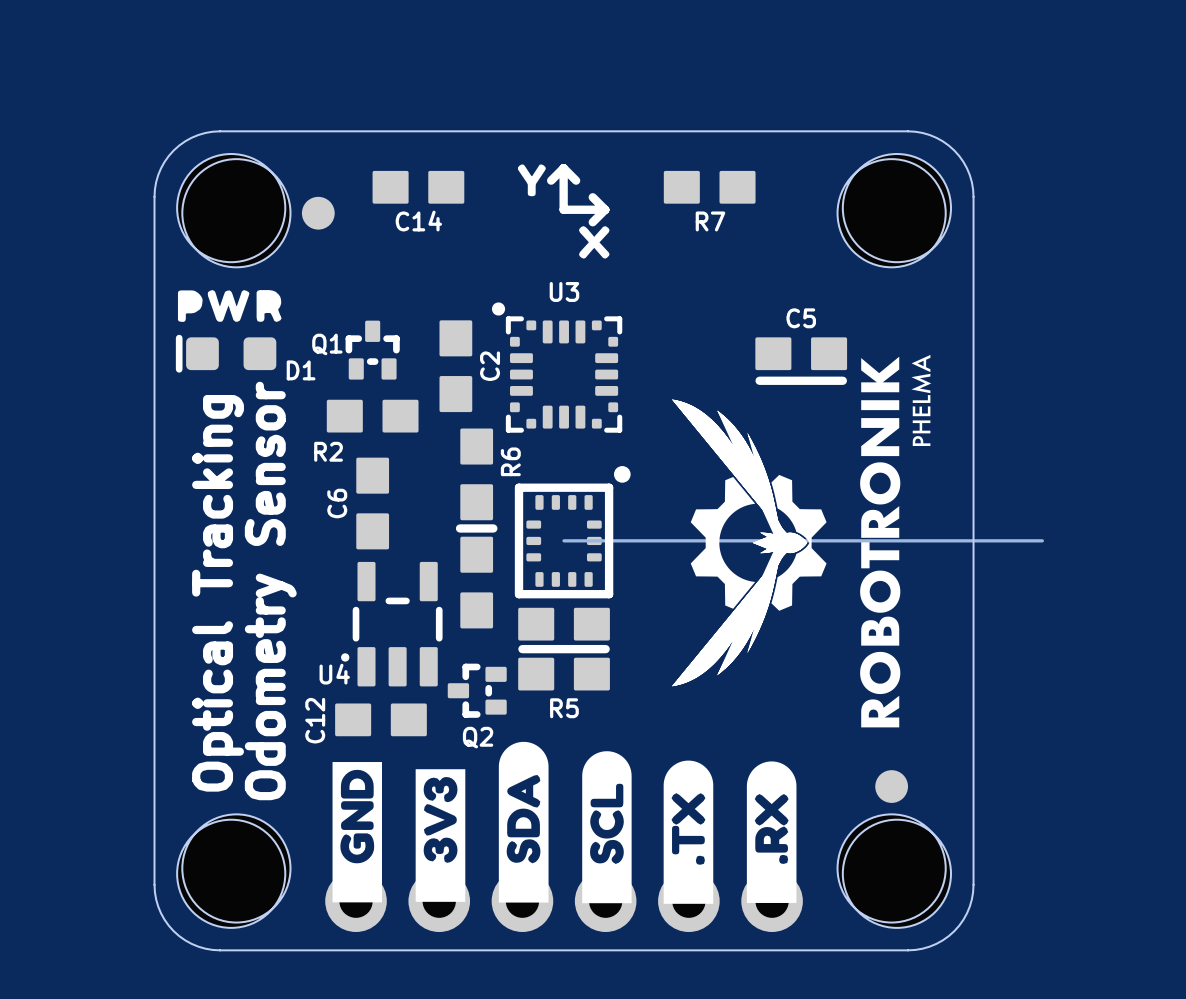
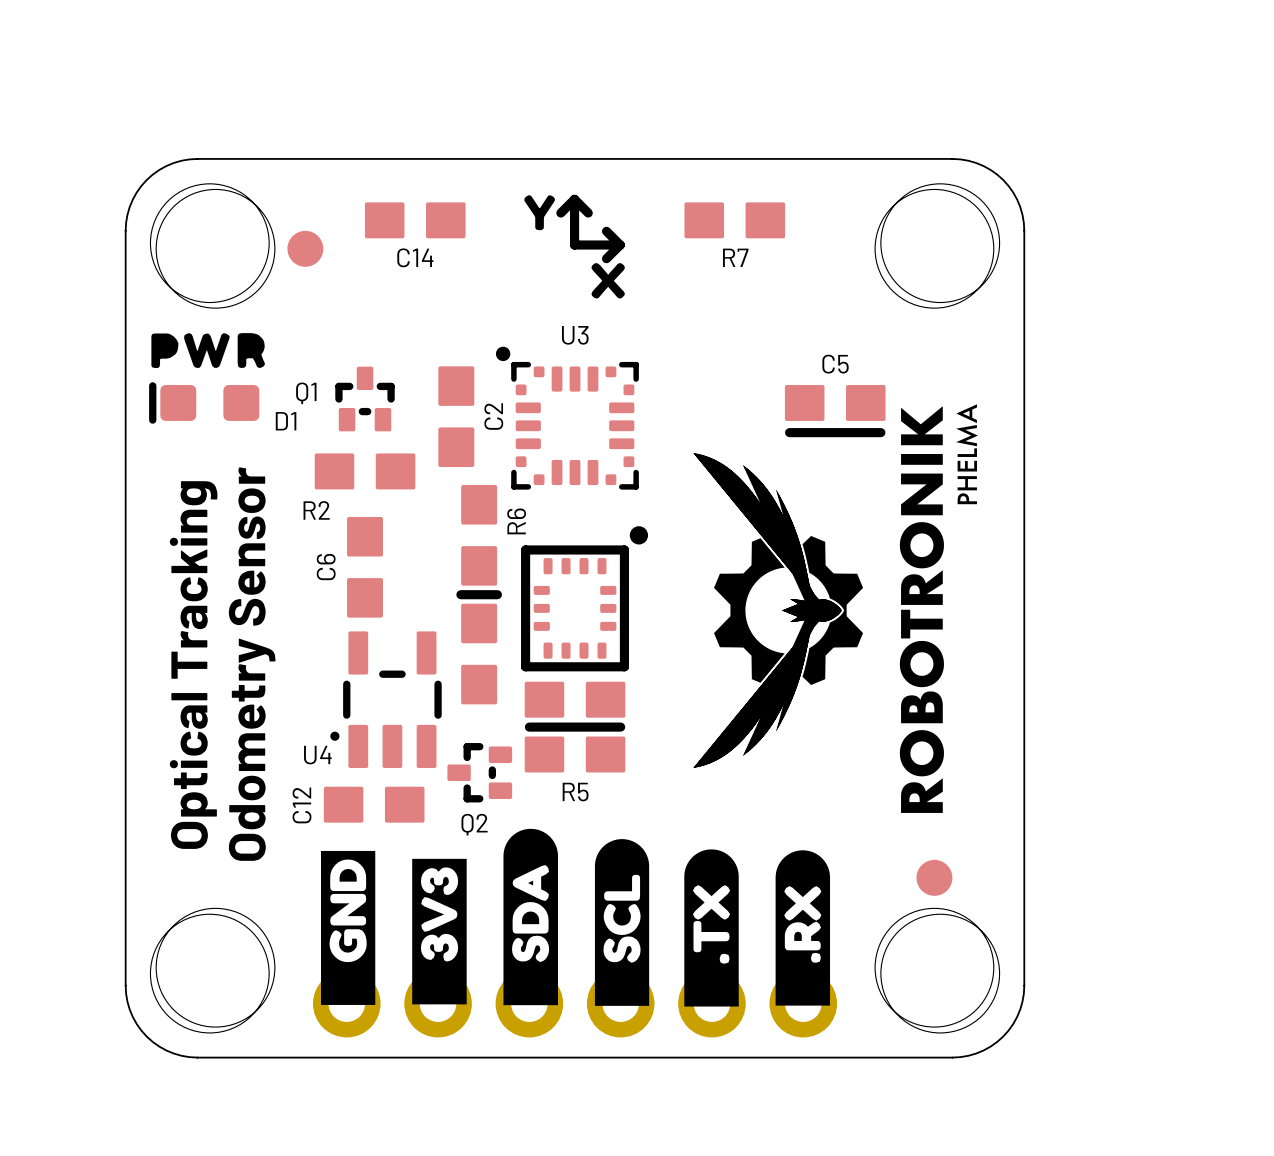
line: (564, 540) (1042, 540) -> none

